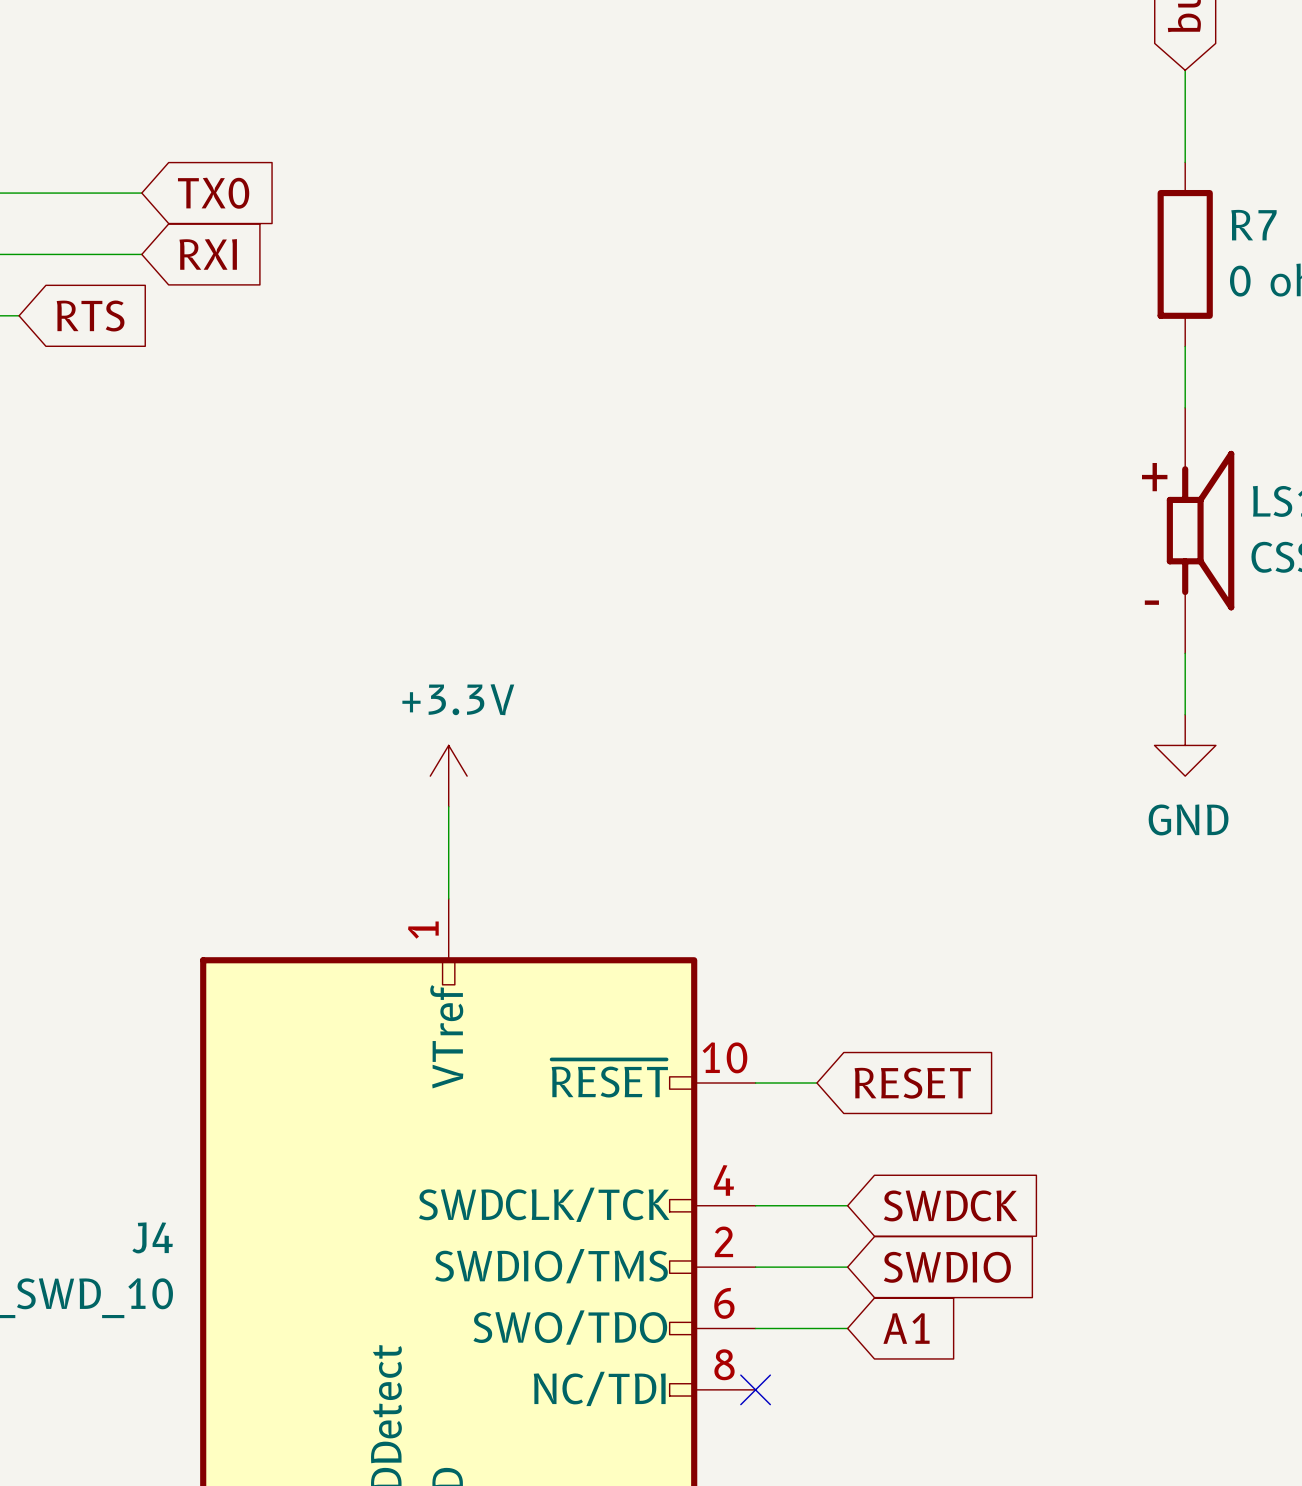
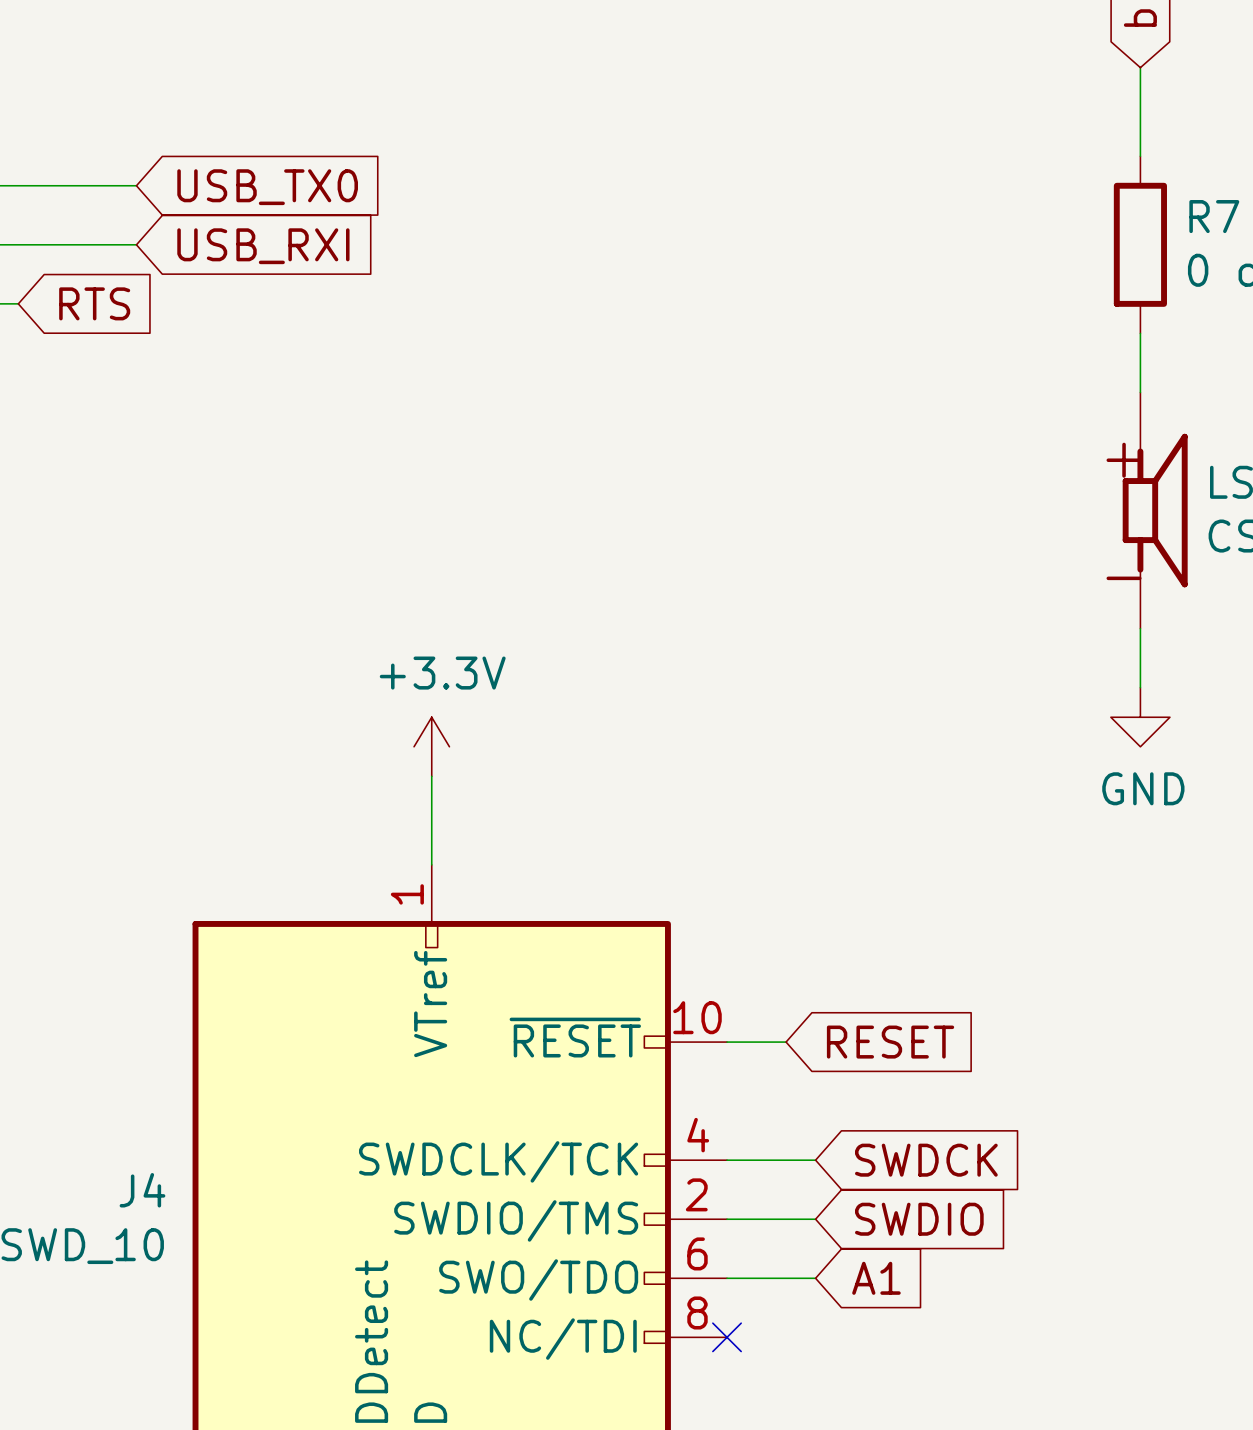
global label: TX0 (213, 193) -> USB_TX0 (267, 187)
global label: RXI (208, 254) -> USB_RXI (263, 246)

